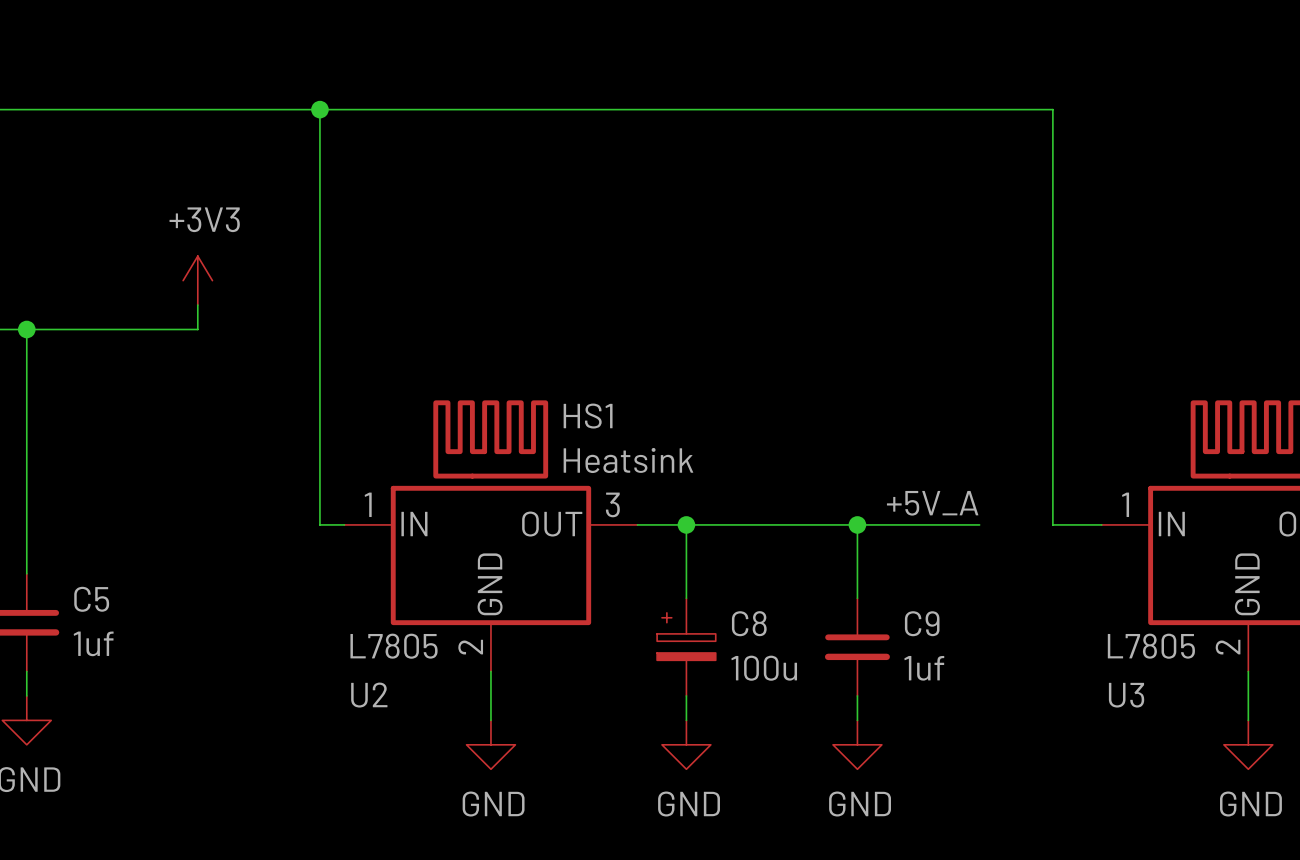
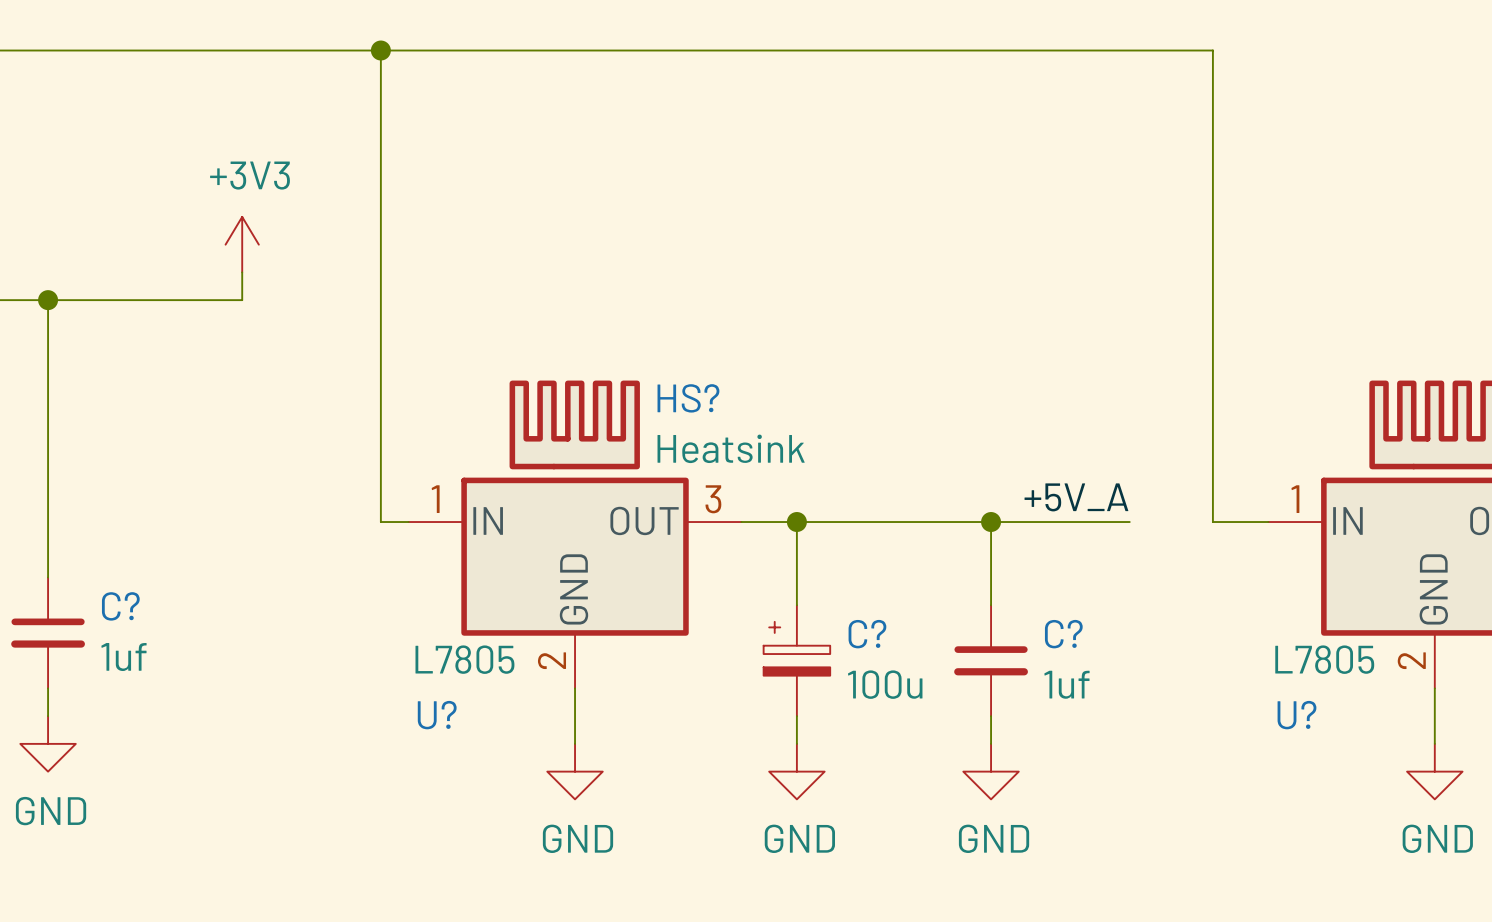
HS1 name: HS1 (588, 416) -> HS? (688, 398)
C5 name: C5 (91, 599) -> C? (120, 606)
C8 name: C8 (749, 623) -> C? (867, 634)
C9 name: C9 (922, 623) -> C? (1063, 634)
U2 name: U2 (369, 695) -> U? (437, 715)
U3 name: U3 (1126, 695) -> U? (1296, 715)

